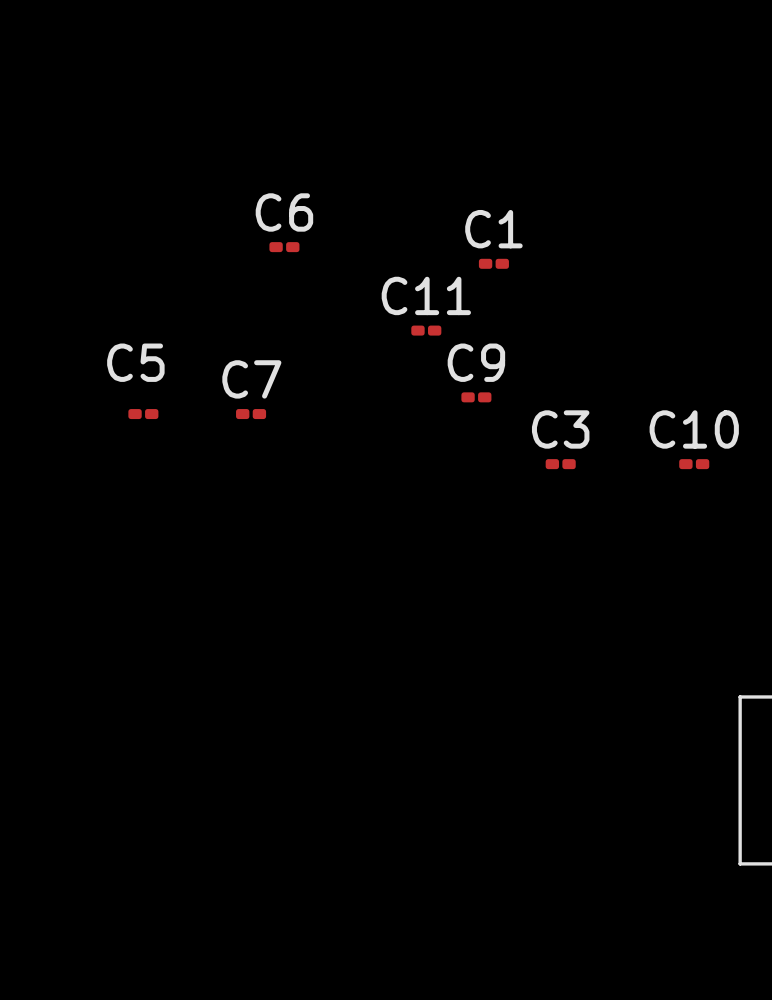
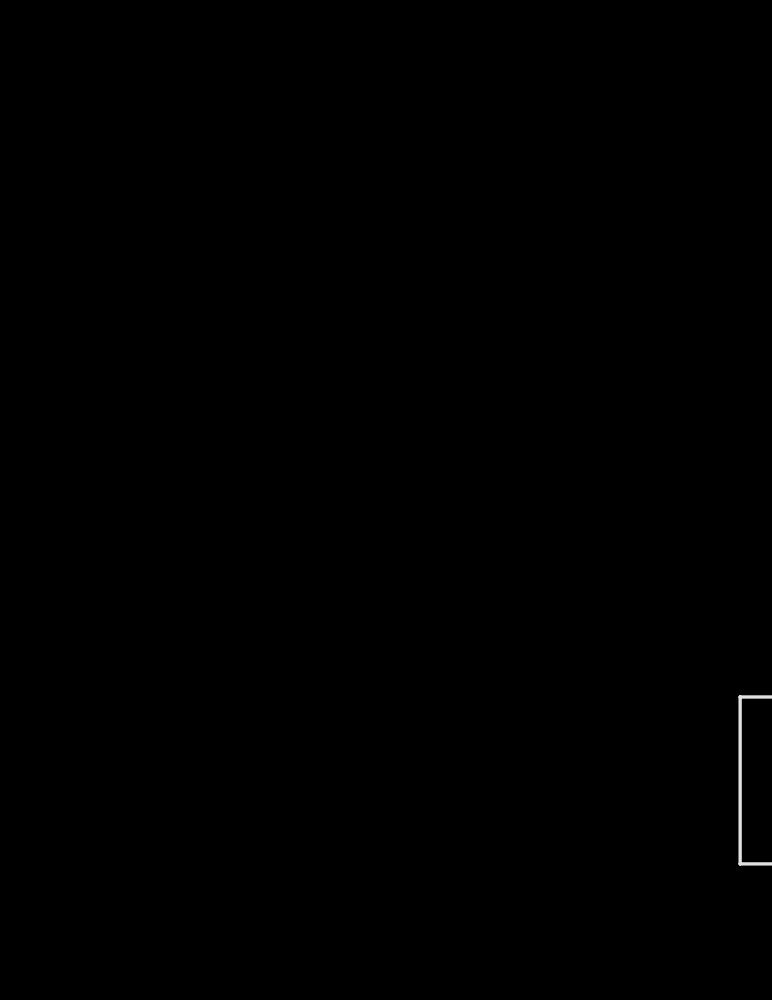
C6: (284, 247) -> none
C1: (493, 263) -> none
C11: (426, 330) -> none
C9: (476, 397) -> none
C5: (143, 414) -> none
C7: (251, 414) -> none
C3: (560, 464) -> none
C10: (694, 464) -> none

